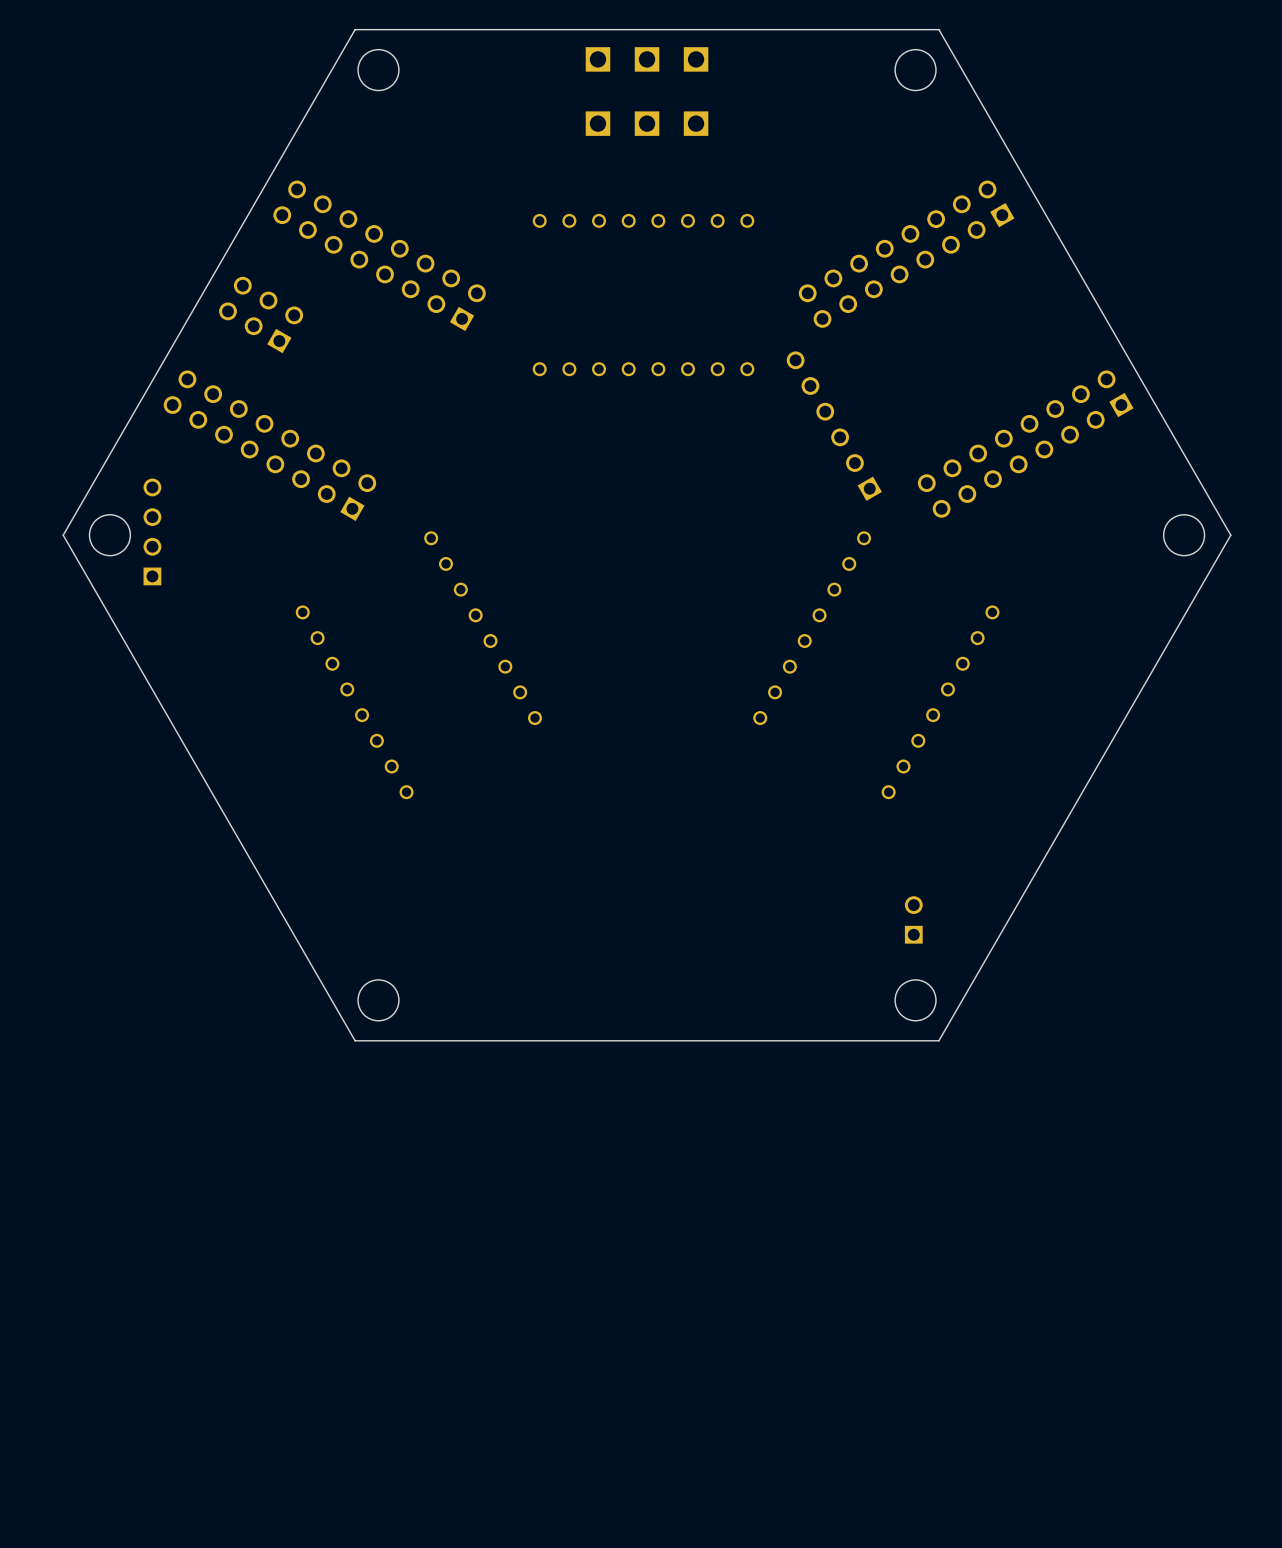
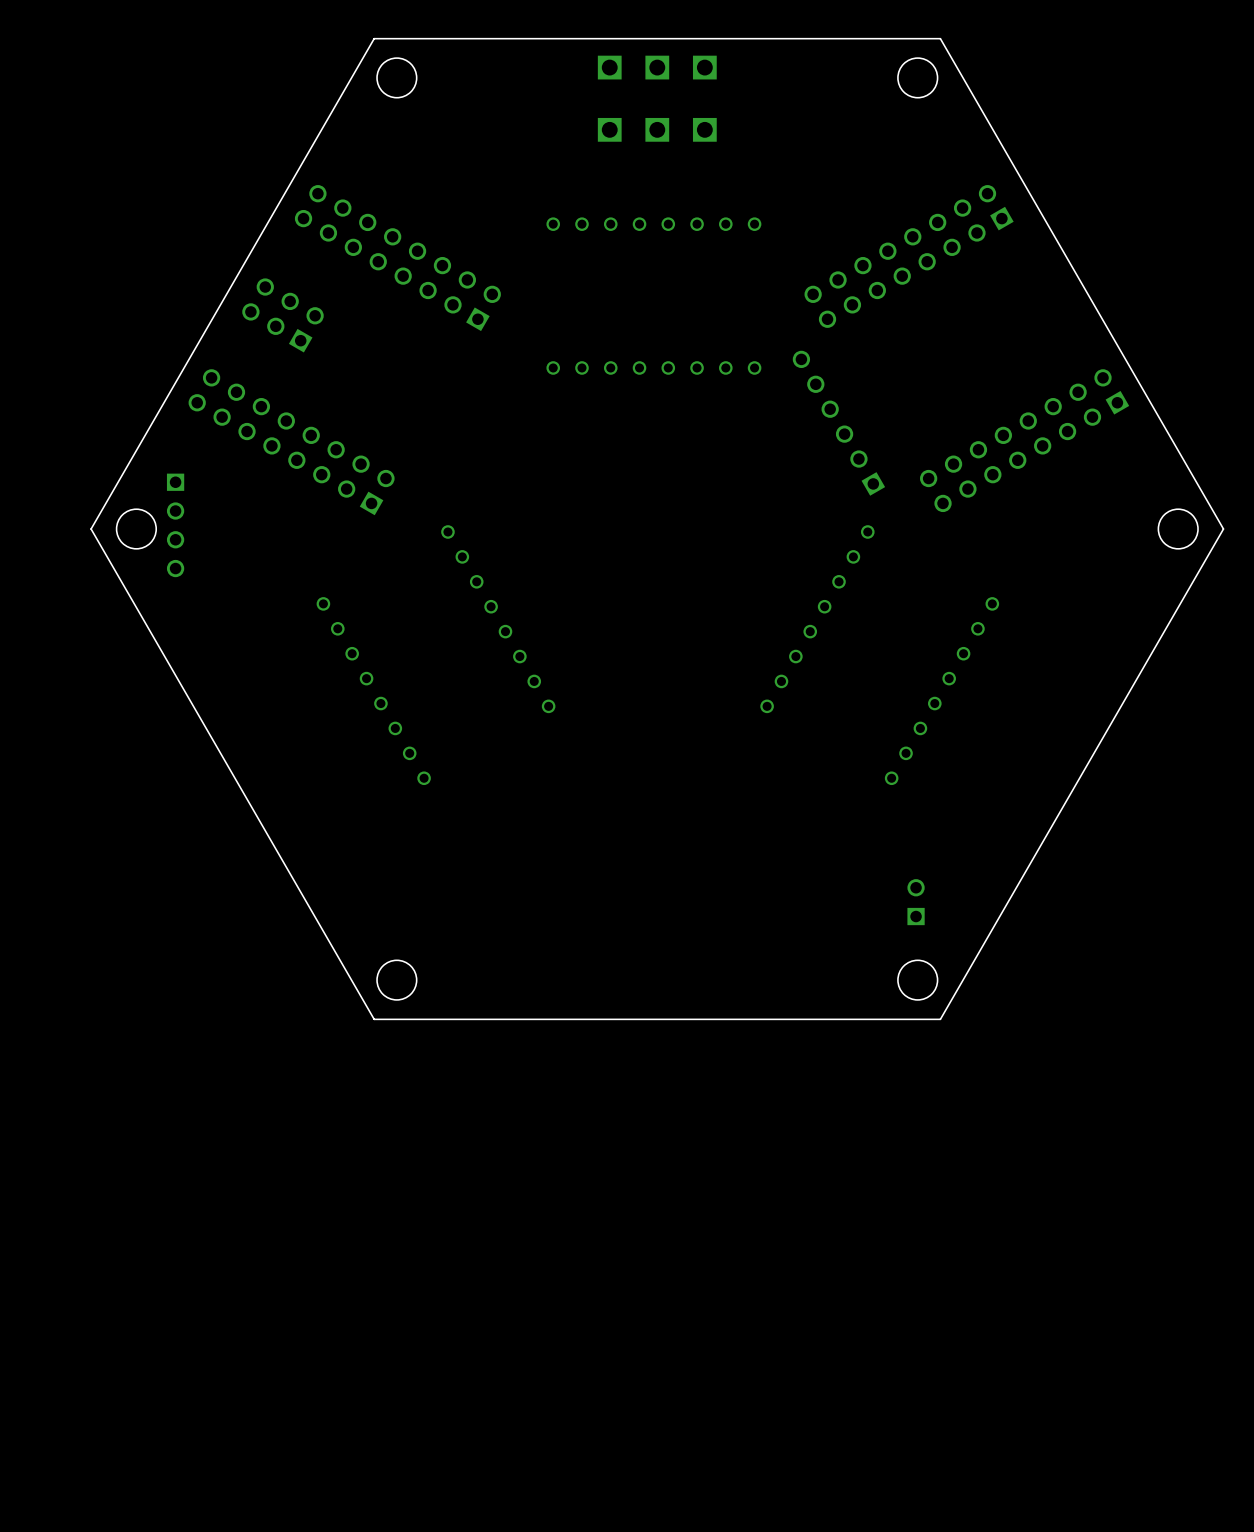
part rotation: 0° (152, 531) -> 180° (175, 525)

